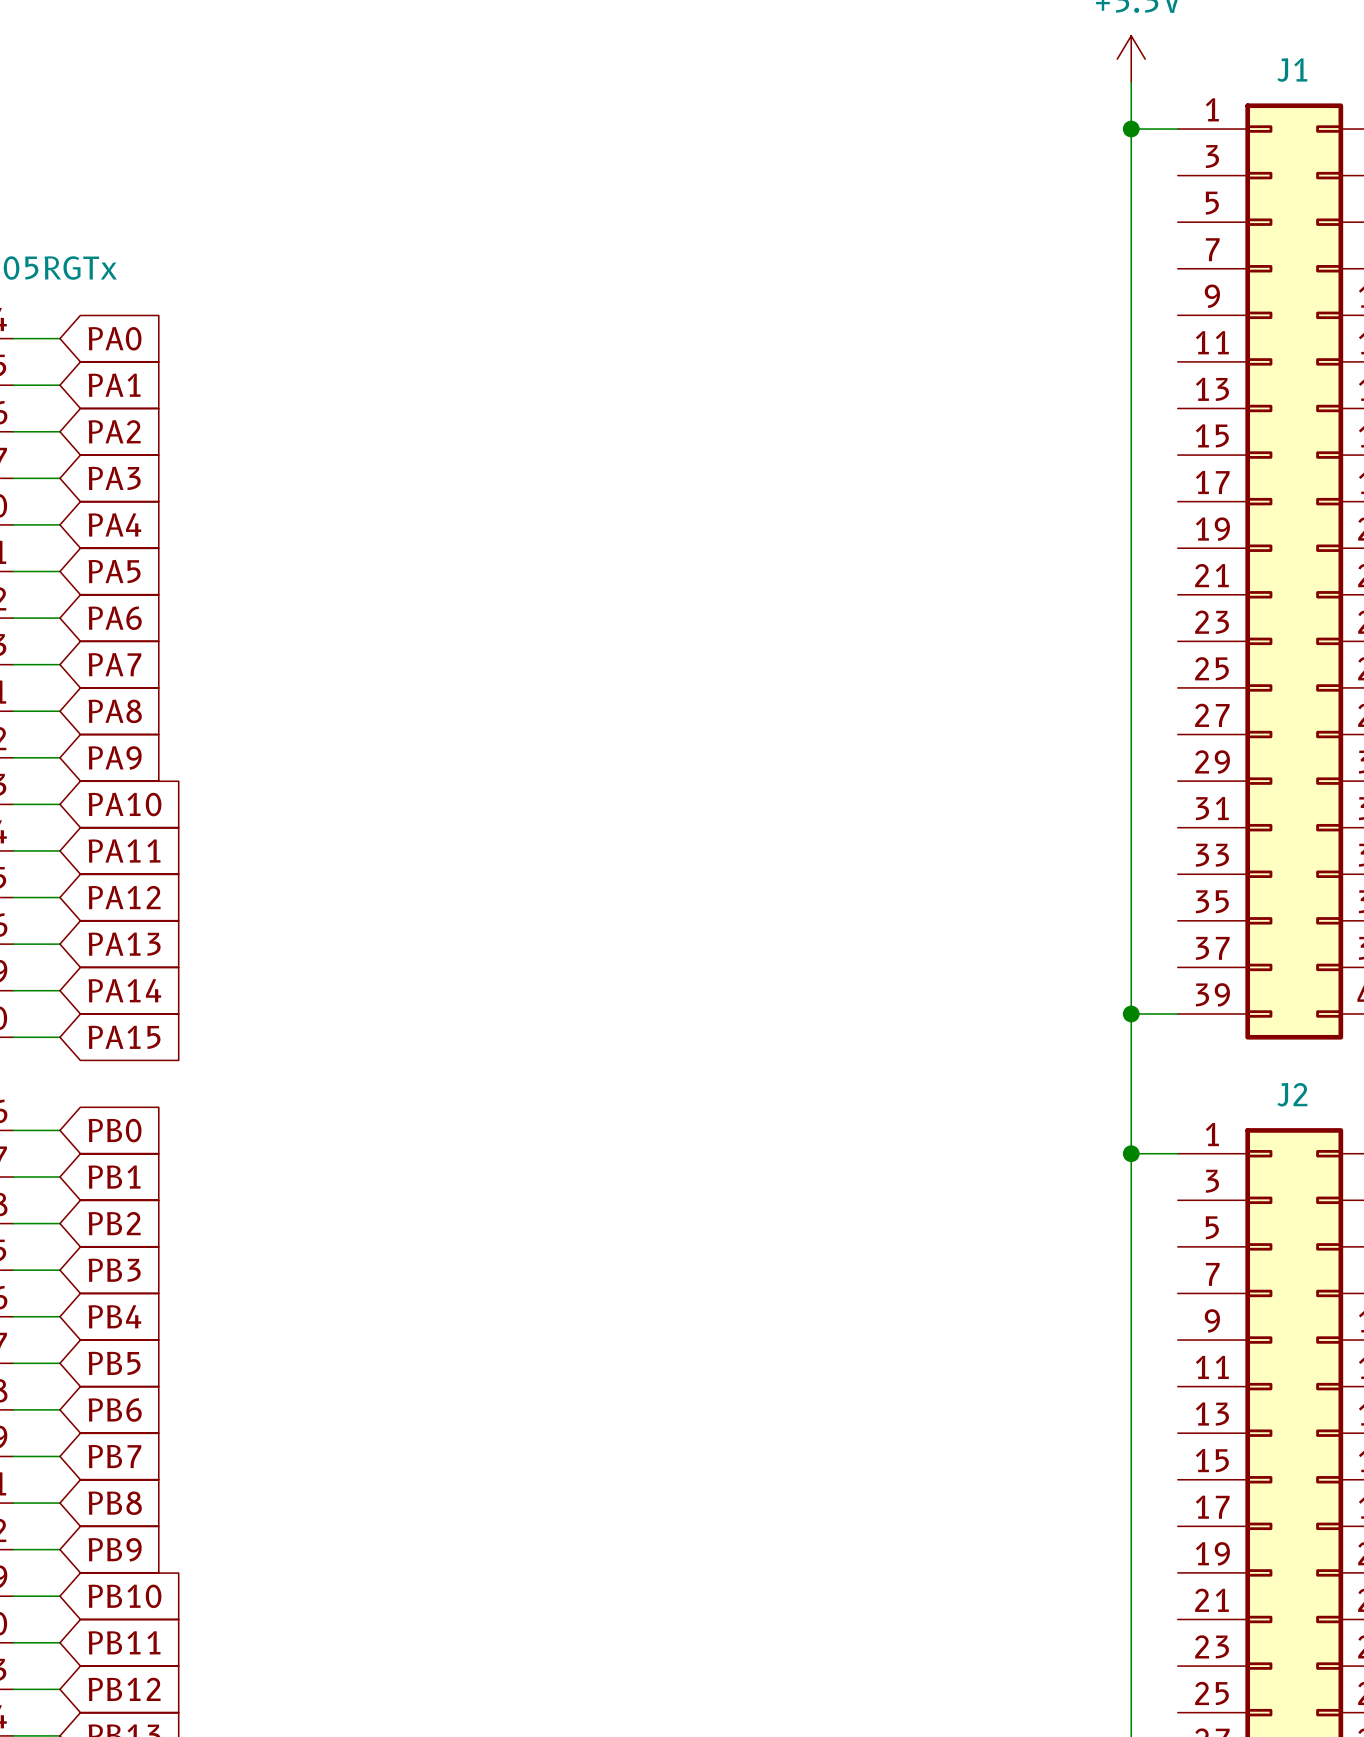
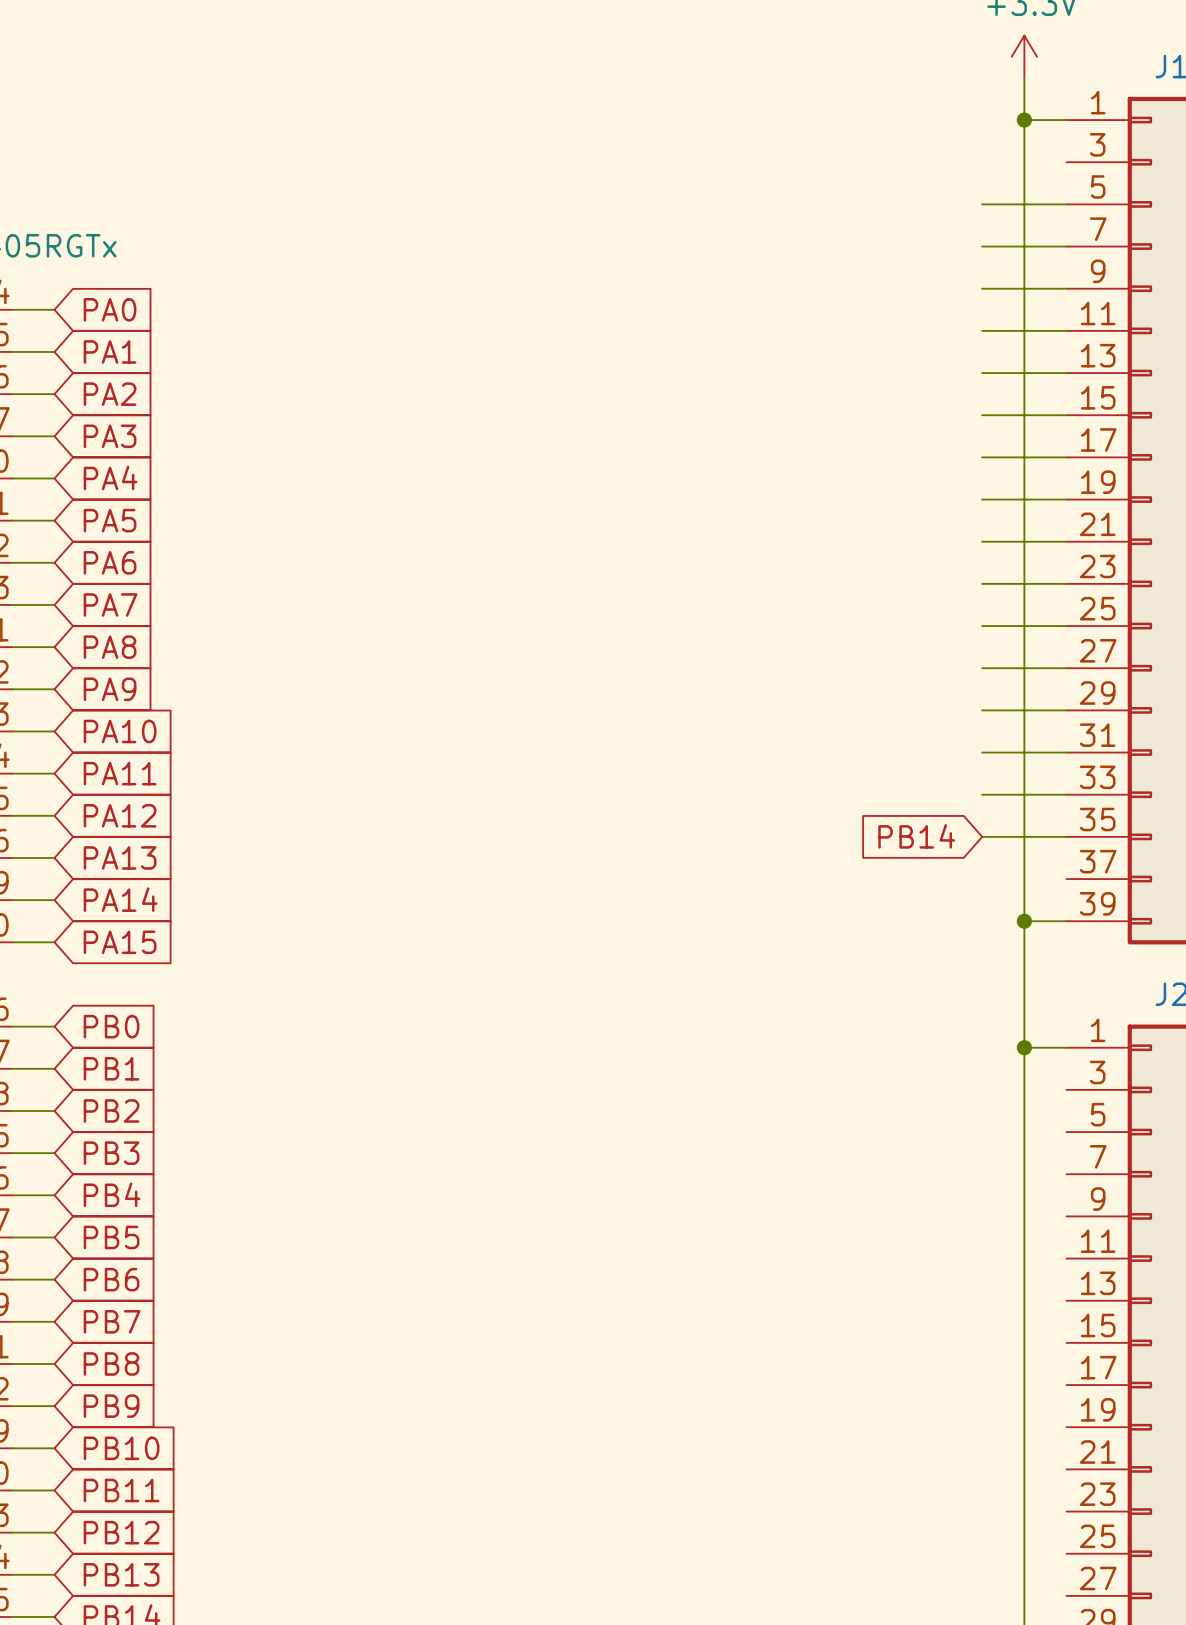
wire: none -> (982, 204) (1066, 204)
wire: none -> (982, 246) (1066, 246)
wire: none -> (982, 288) (1066, 288)
wire: none -> (982, 330) (1066, 330)
wire: none -> (982, 373) (1066, 373)
wire: none -> (982, 415) (1066, 415)
wire: none -> (982, 457) (1066, 457)
wire: none -> (982, 499) (1066, 499)
wire: none -> (982, 541) (1066, 541)
wire: none -> (982, 583) (1066, 583)
wire: none -> (982, 626) (1066, 626)
wire: none -> (982, 668) (1066, 668)
wire: none -> (982, 710) (1066, 710)
wire: none -> (982, 752) (1066, 752)
wire: none -> (982, 794) (1066, 794)
global label: none -> PB14 (916, 836)
wire: none -> (982, 836) (1066, 836)

